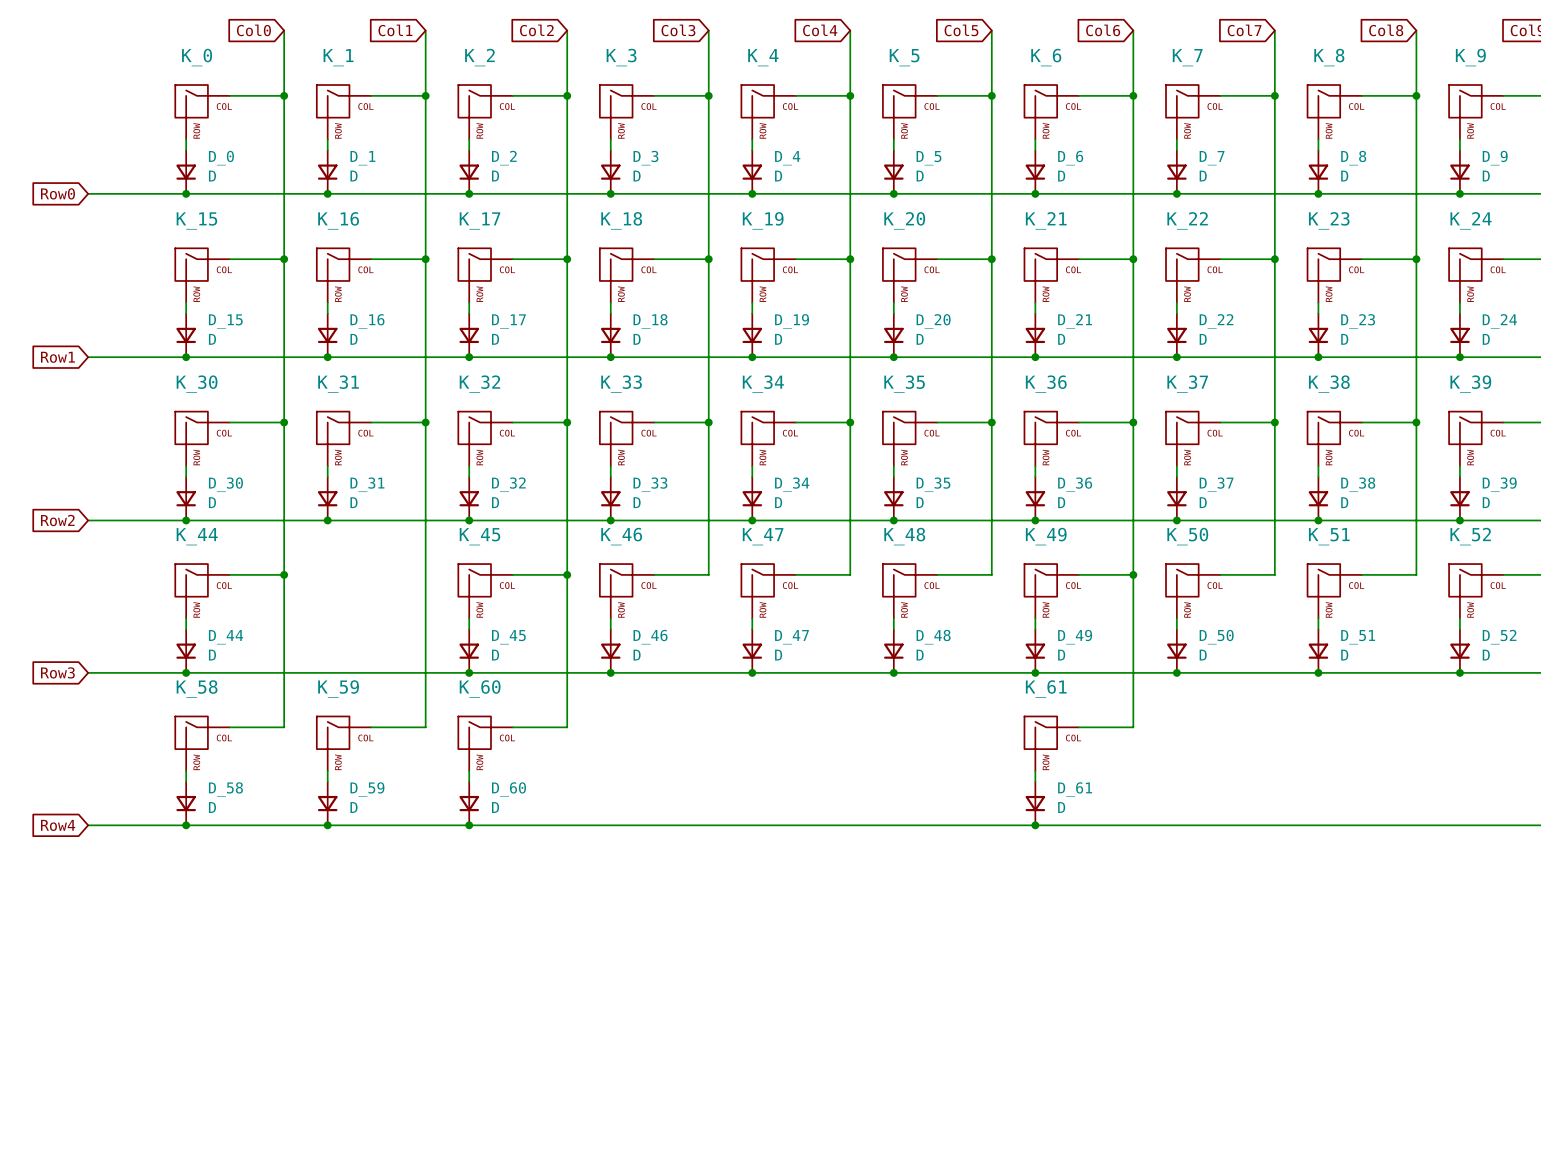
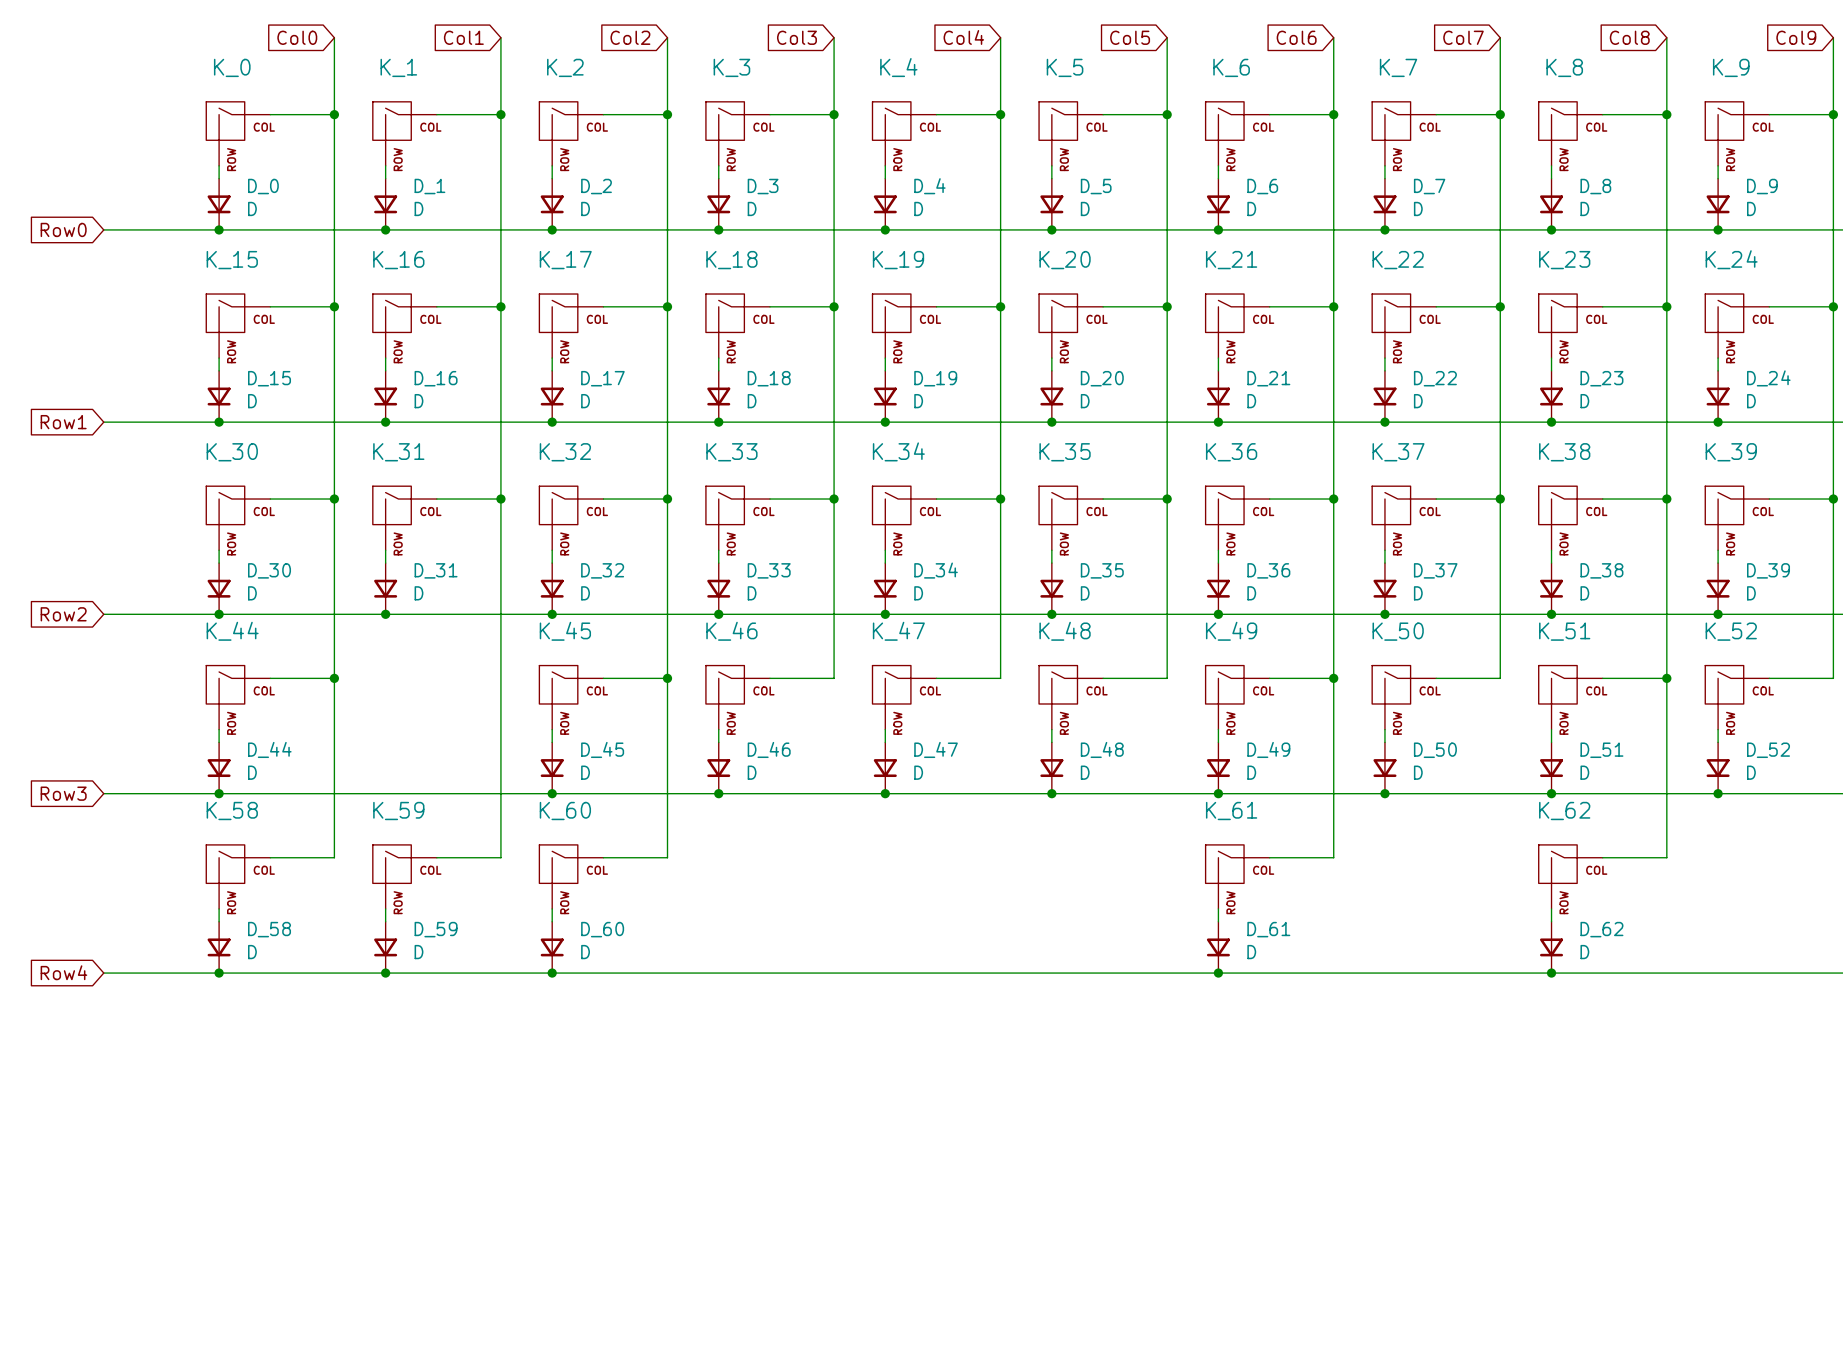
wire: none -> (1666, 678) (1666, 857) (1602, 857)
junction: none -> (1666, 678)
K_62: none -> (1570, 876)
wire: none -> (1551, 908) (1551, 921)
D_62: none -> D (1551, 947)
junction: none -> (1551, 973)

